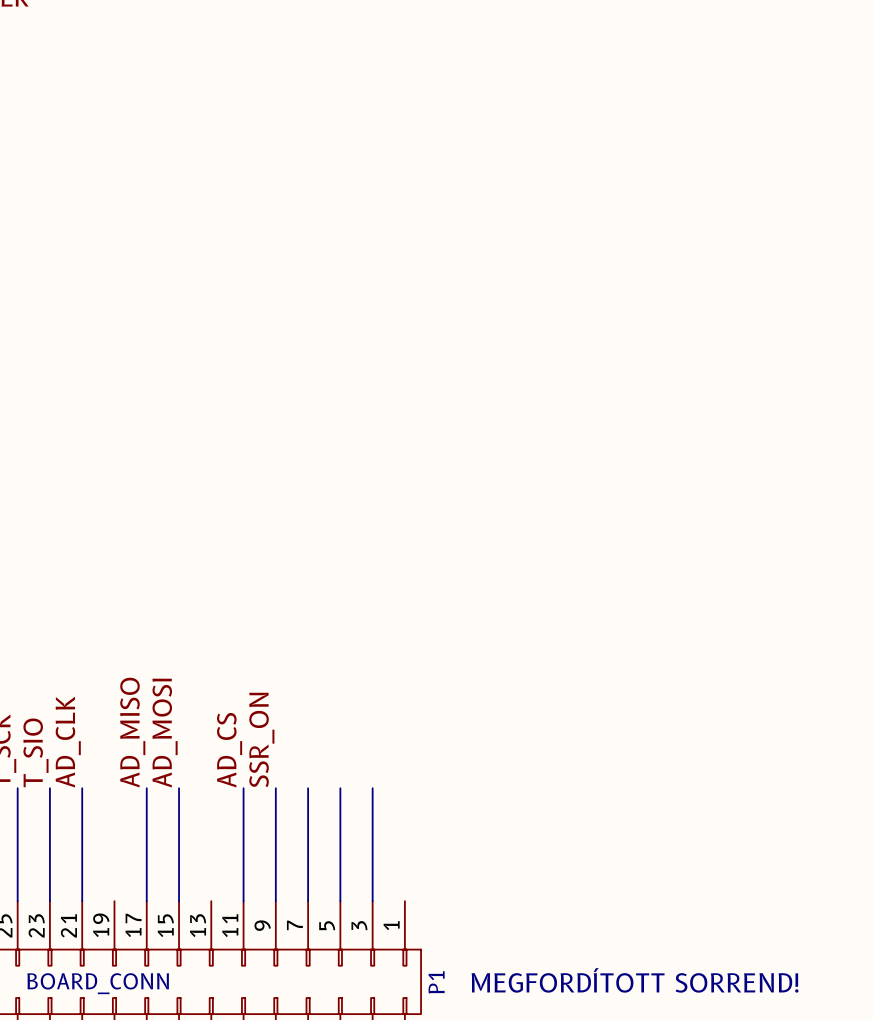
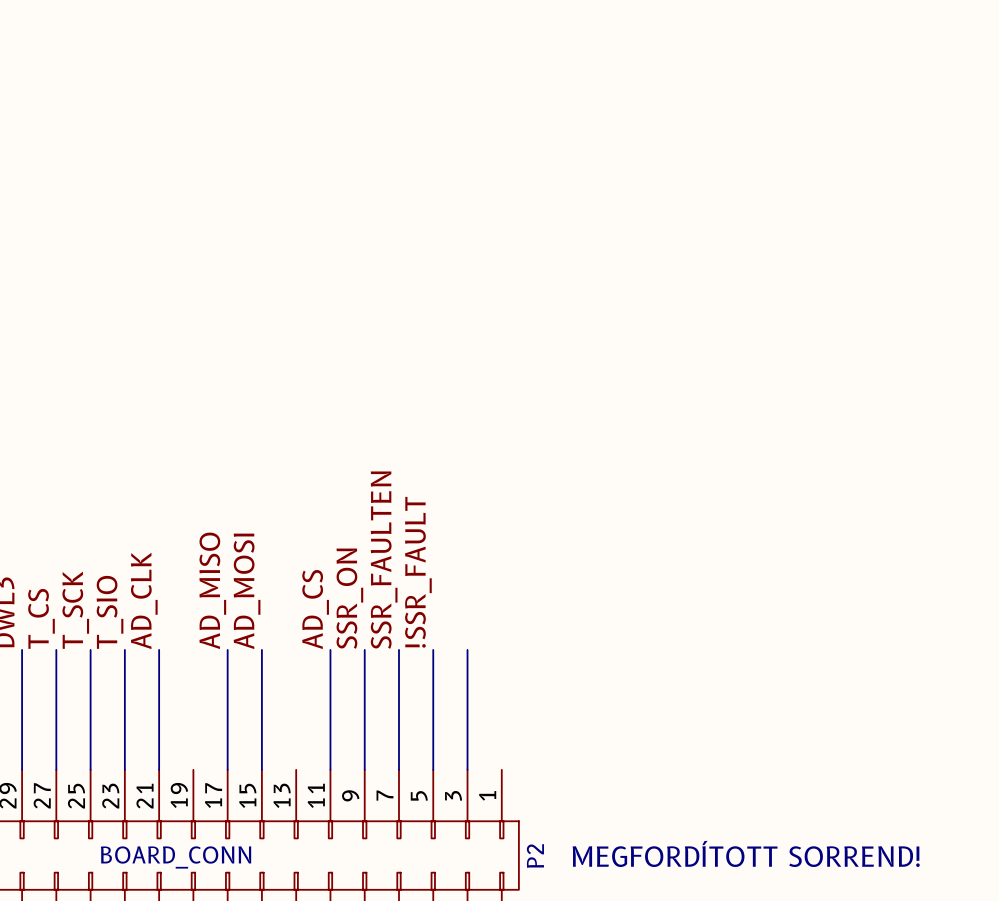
label: none -> SSR_FAULTEN (384, 560)
label: none -> !SSR_FAULT (418, 572)
P1 name: P1 (436, 982) -> P2 (535, 856)

